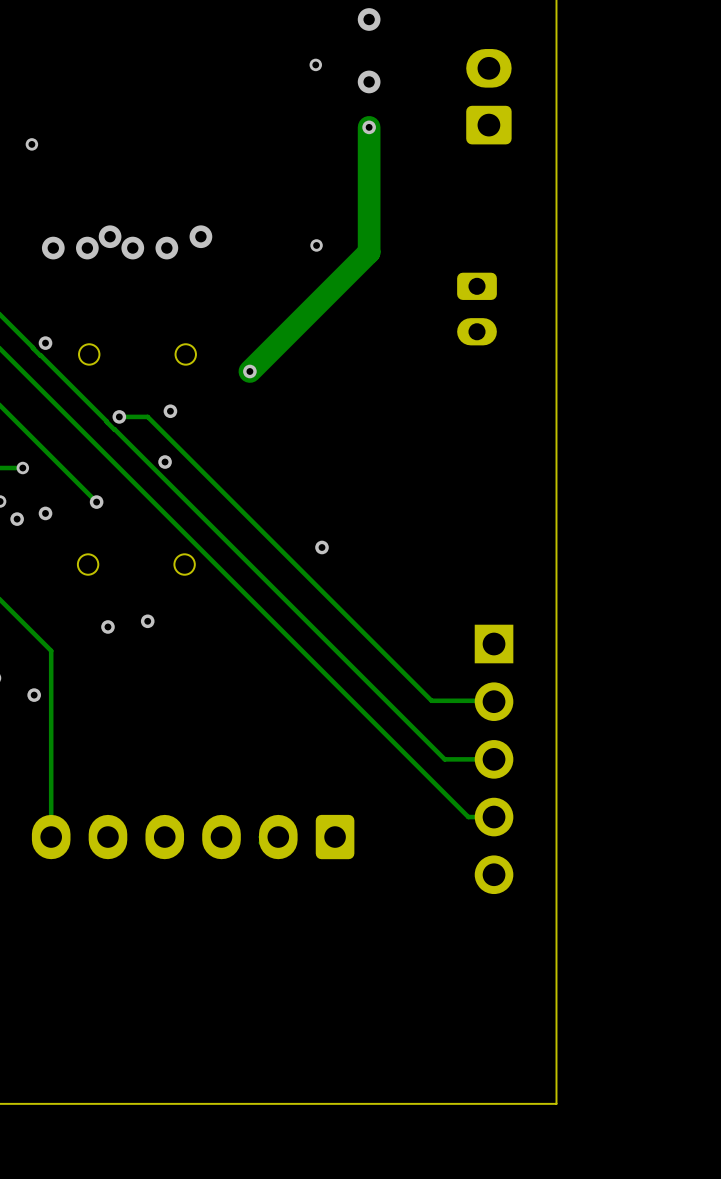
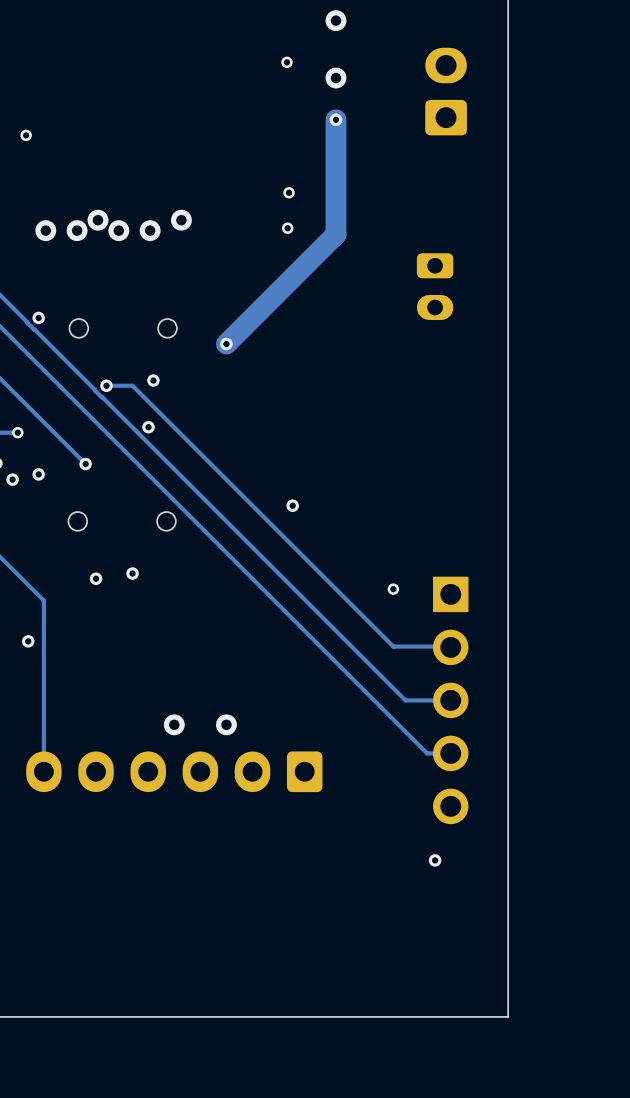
via: none -> (289, 192)
via: none -> (393, 589)
via: none -> (174, 724)
via: none -> (226, 724)
via: none -> (435, 860)

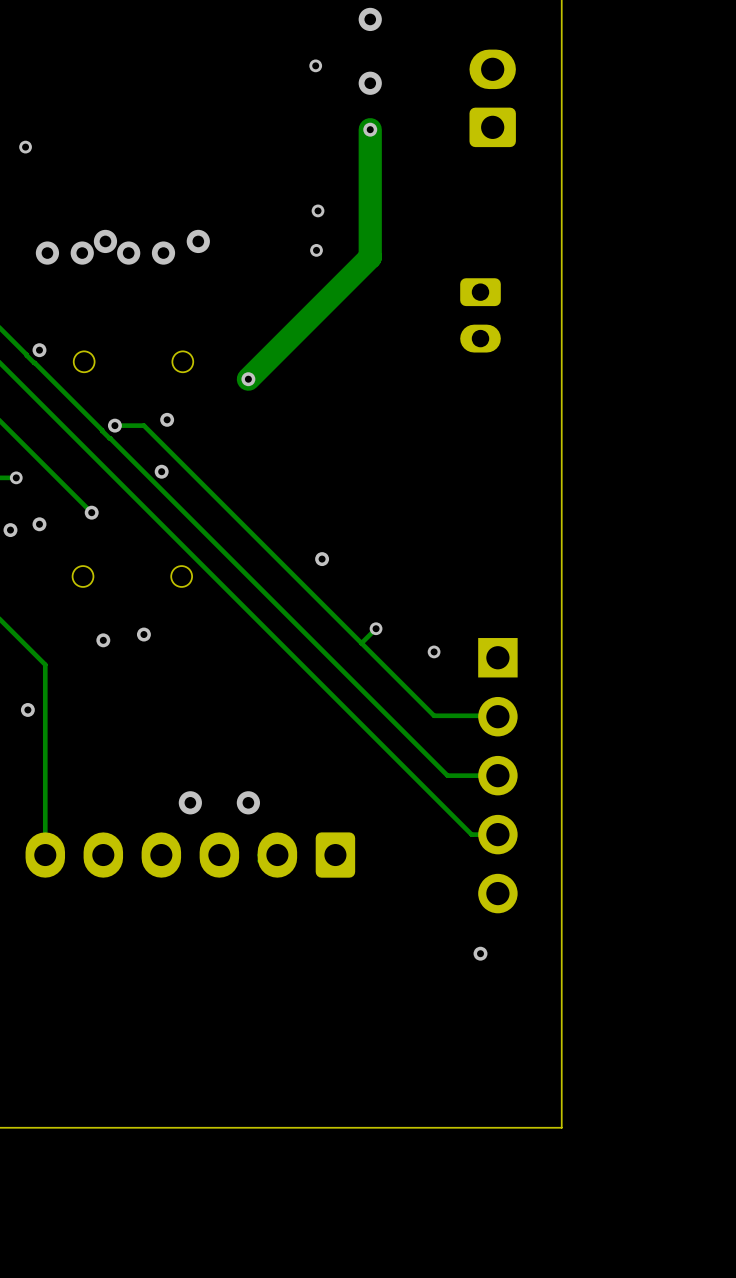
track: none -> (376, 628) (361, 643)
via: none -> (376, 628)

